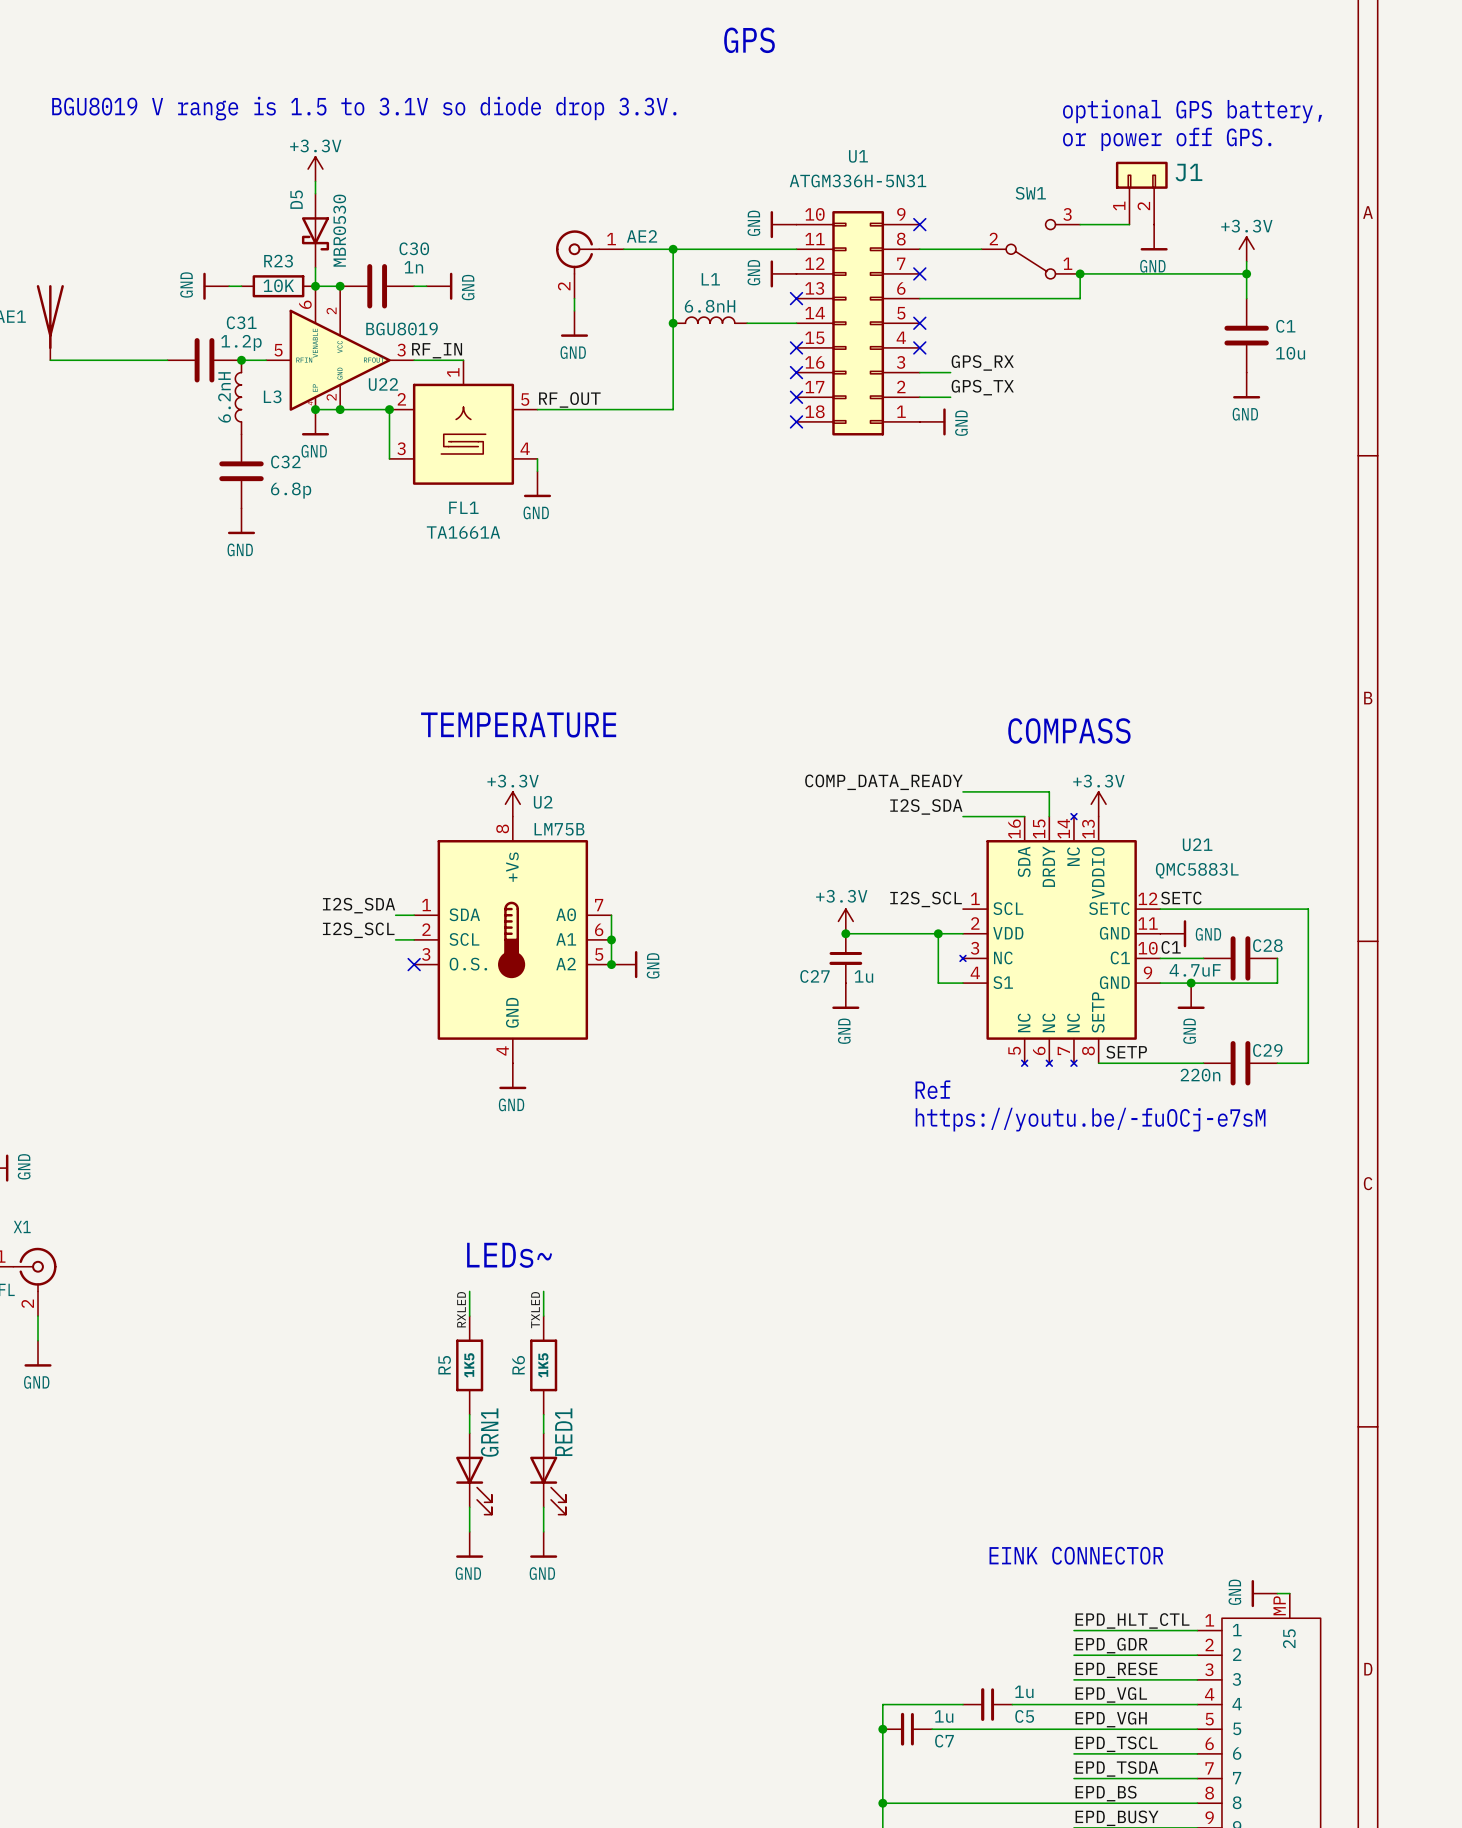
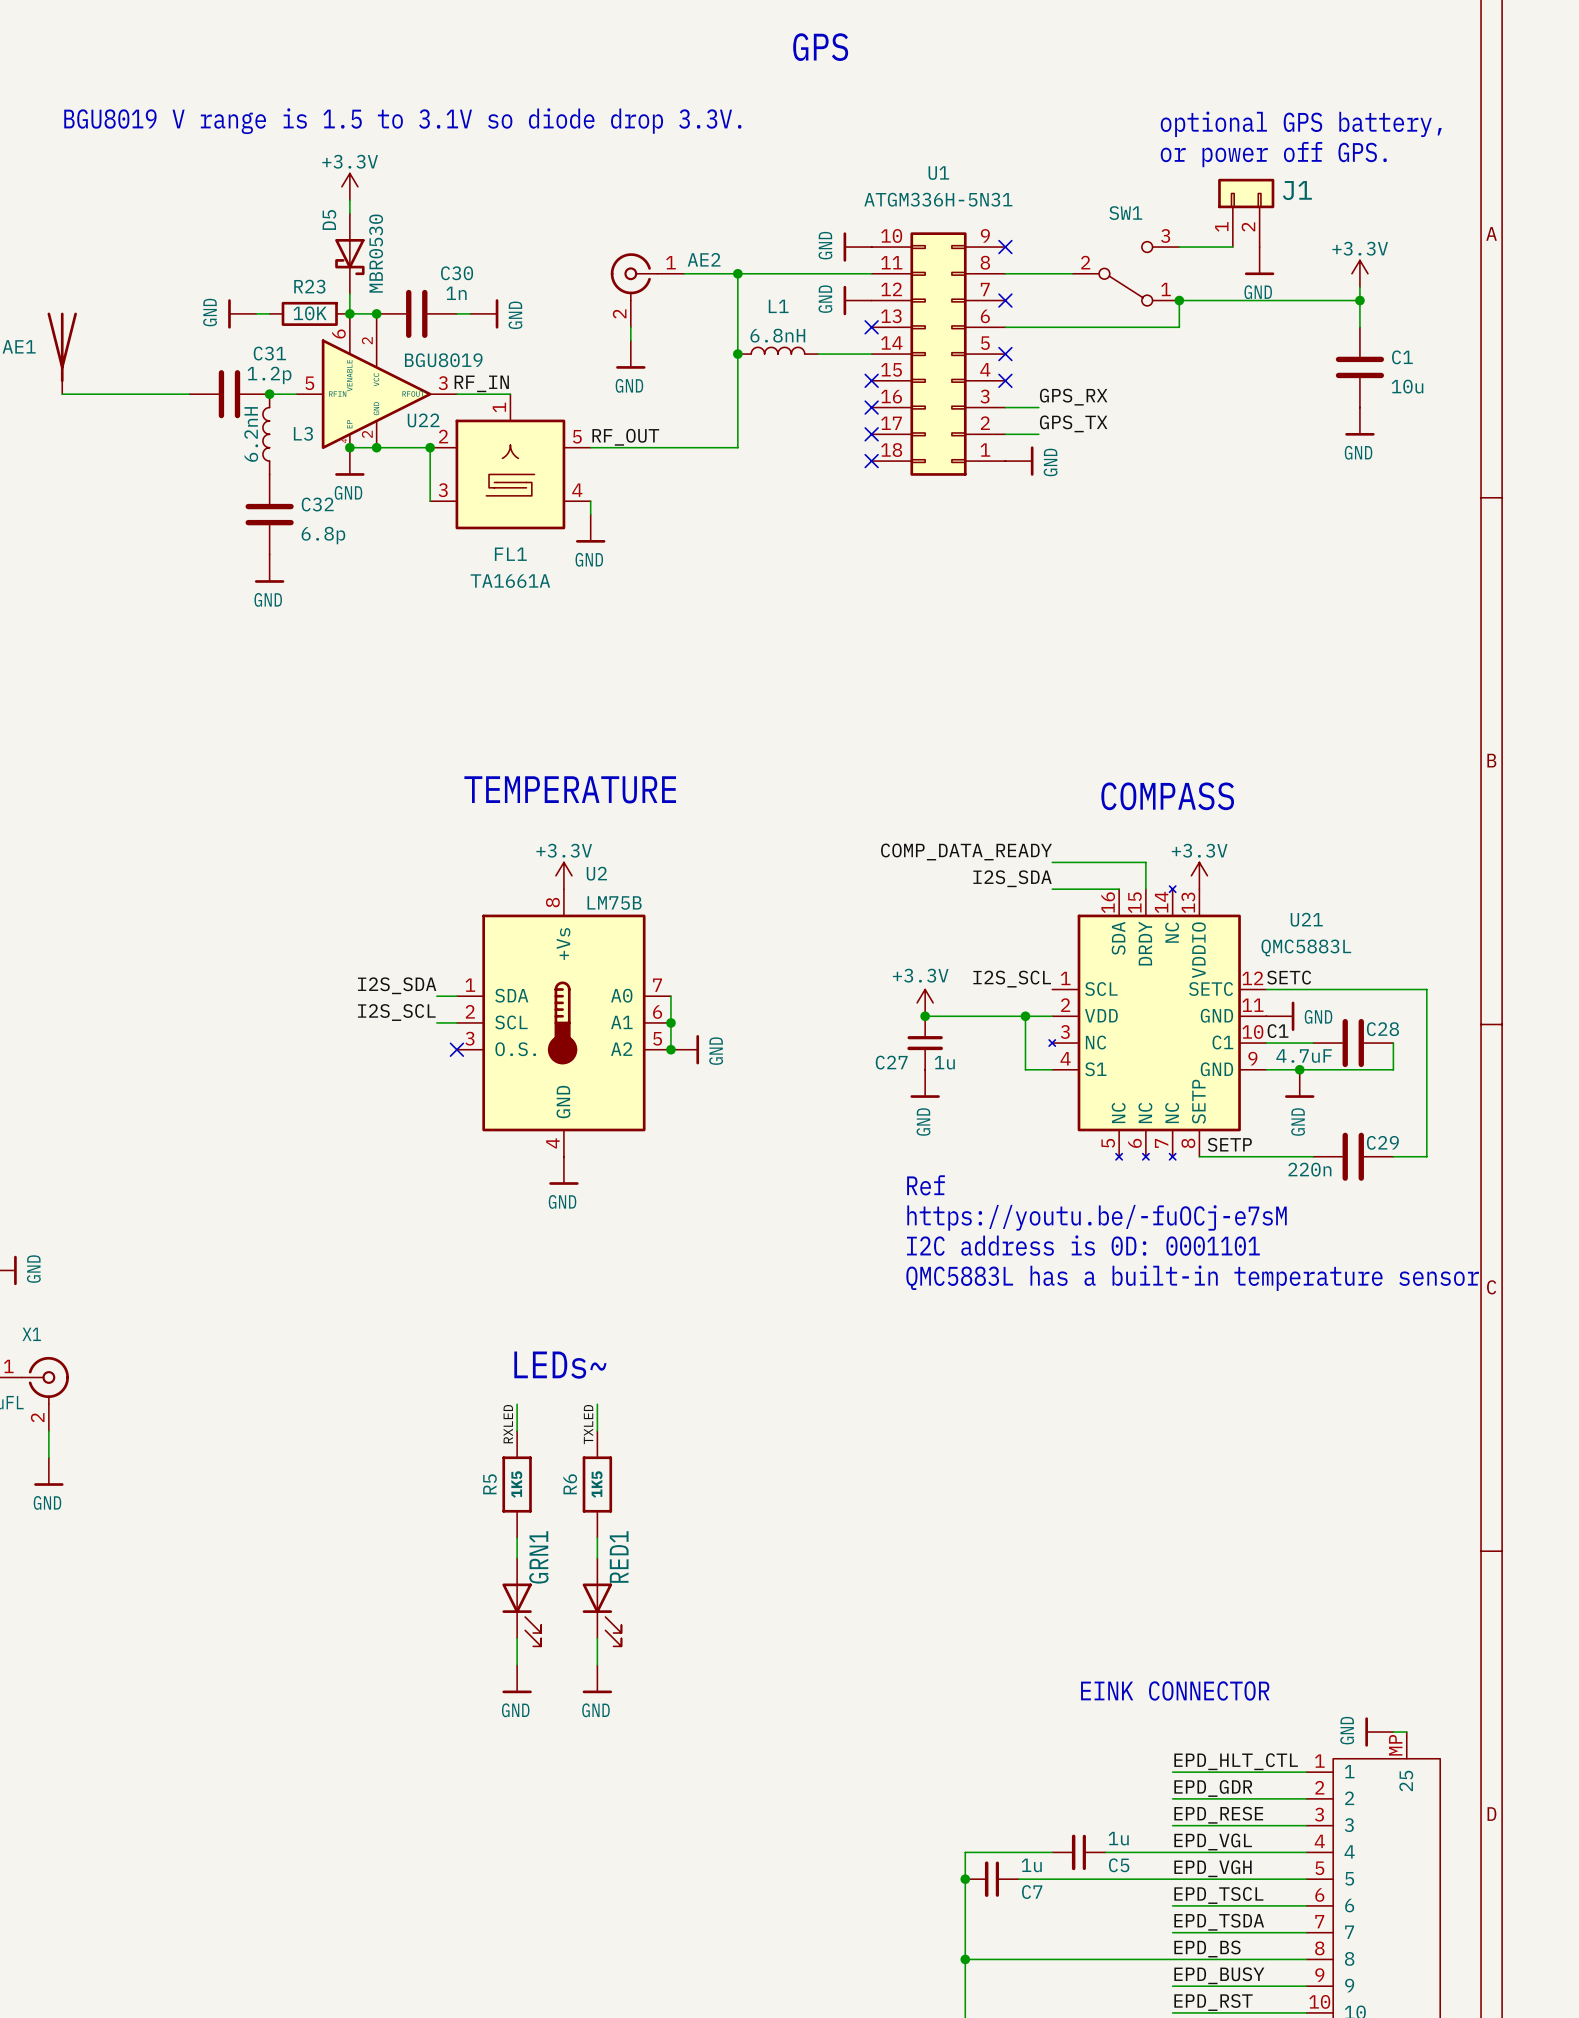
text position: Ref (932, 1089) -> Ref (925, 1185)
text position: https://youtu.be/-fuOCj-e7sM (1090, 1119) -> https://youtu.be/-fuOCj-e7sM (1097, 1217)
text: none -> I2C address is 0D: 0001101 (1083, 1245)
text: none -> QMC5883L has a built-in temperature sensor (1192, 1278)

